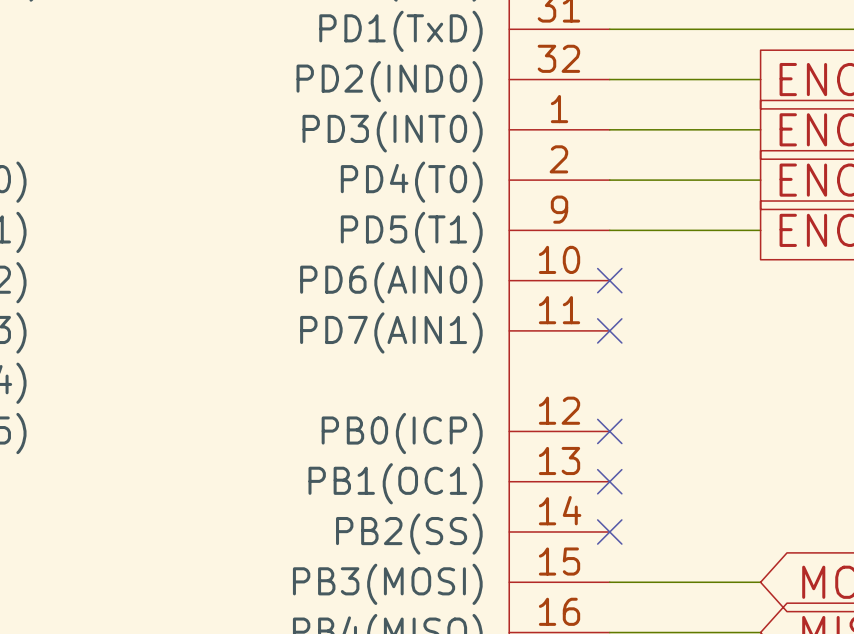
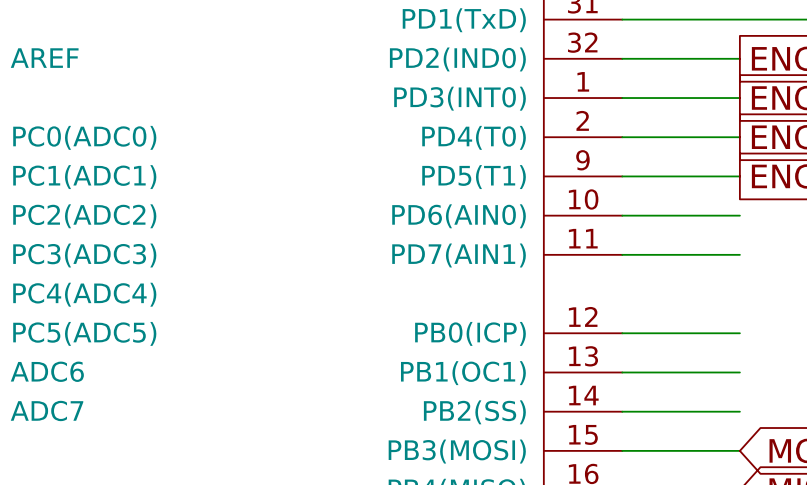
wire: none -> (622, 215) (739, 215)
no-connect mark: (609, 280) -> none
wire: none -> (622, 254) (739, 254)
no-connect mark: (609, 330) -> none
wire: none -> (622, 333) (739, 333)
no-connect mark: (609, 431) -> none
wire: none -> (622, 372) (739, 372)
no-connect mark: (609, 481) -> none
wire: none -> (622, 411) (739, 411)
no-connect mark: (609, 531) -> none

